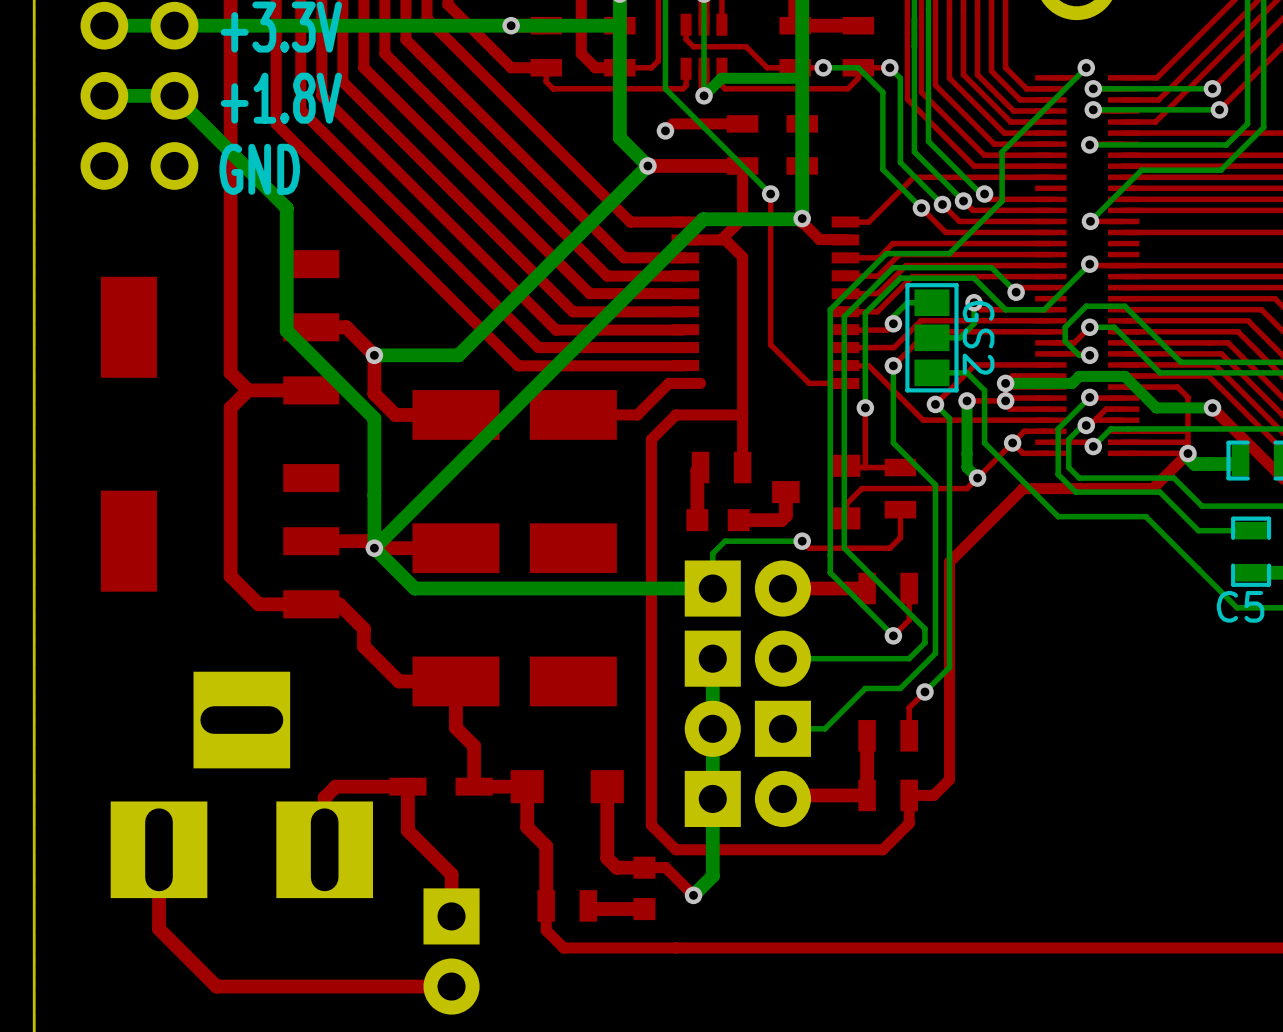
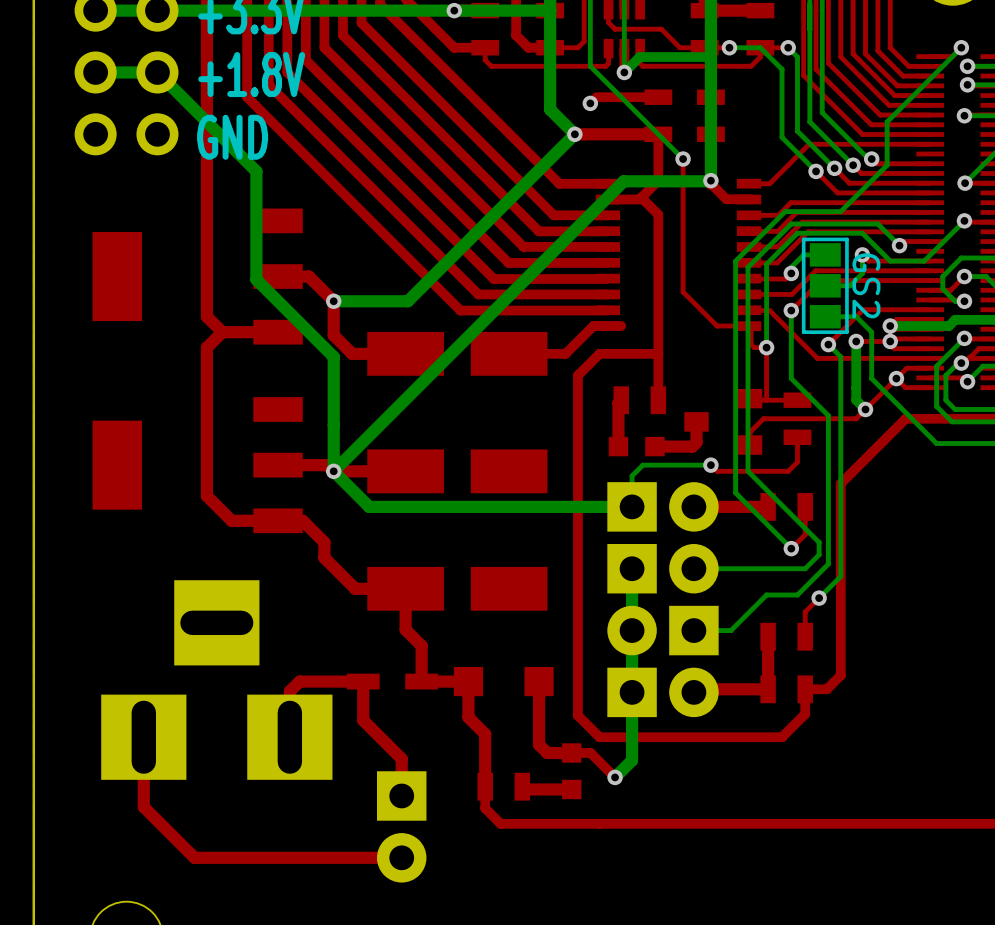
top track: none -> (751, 326) (751, 344) (754, 347) (766, 347)

